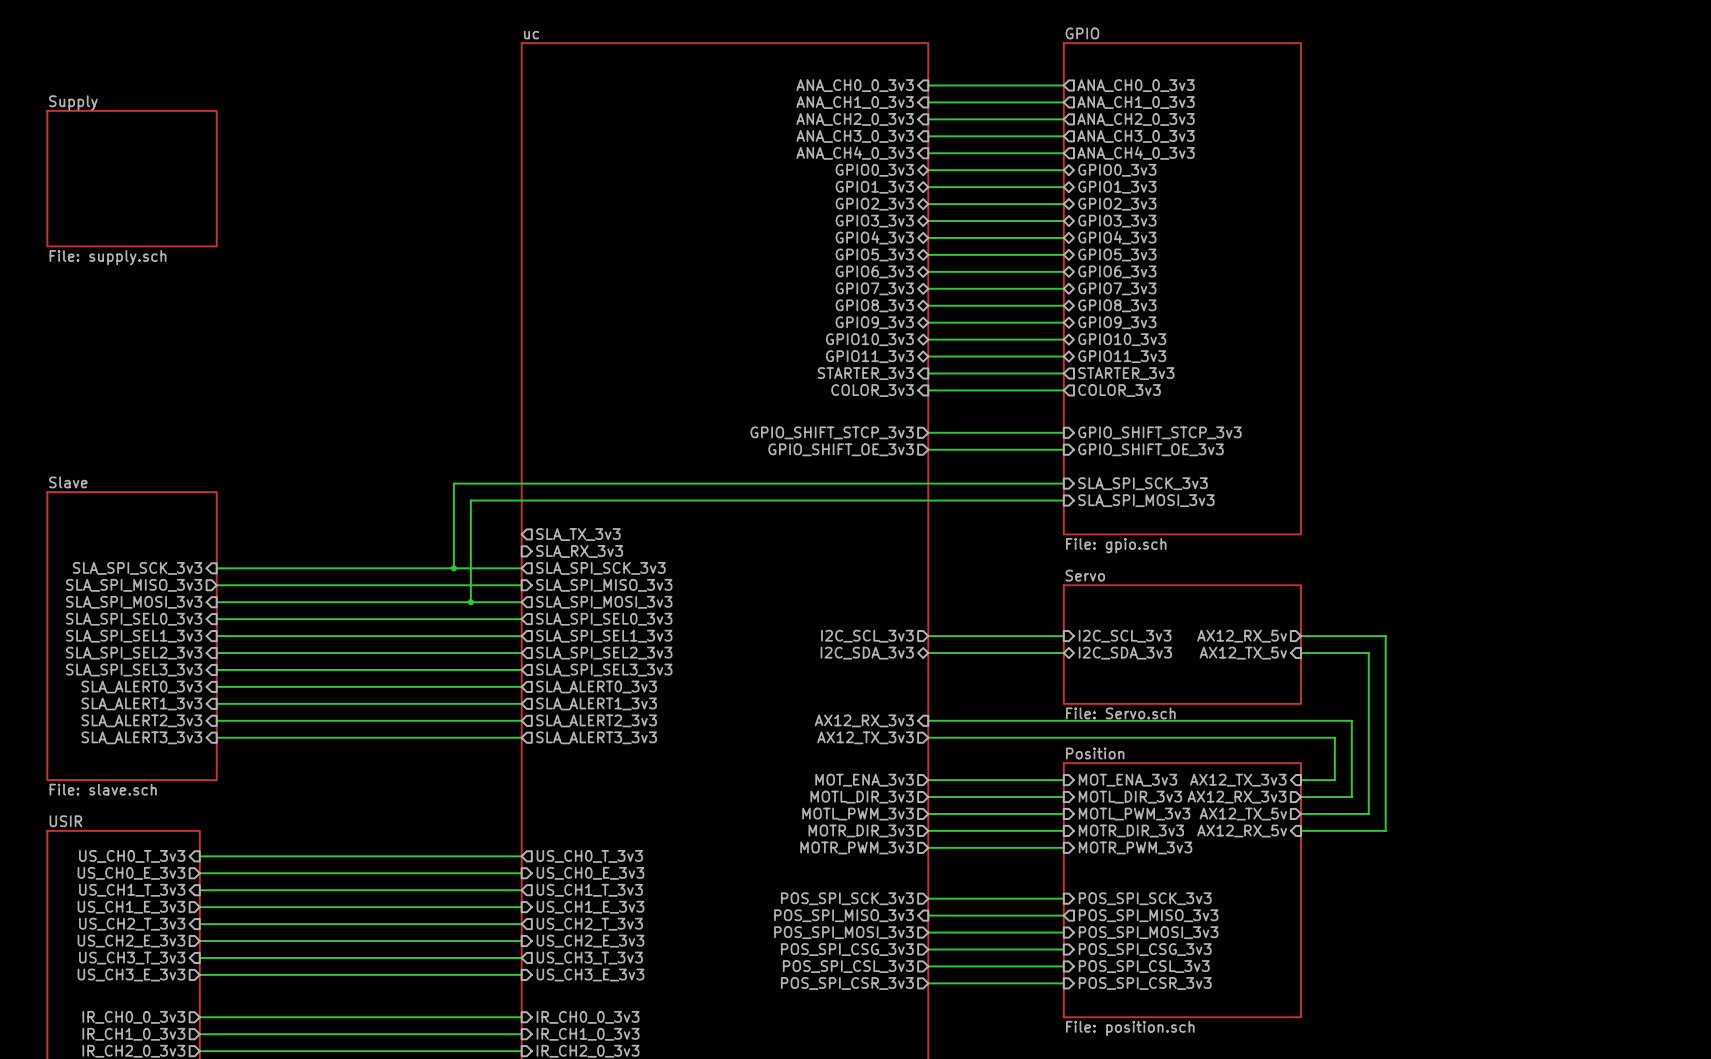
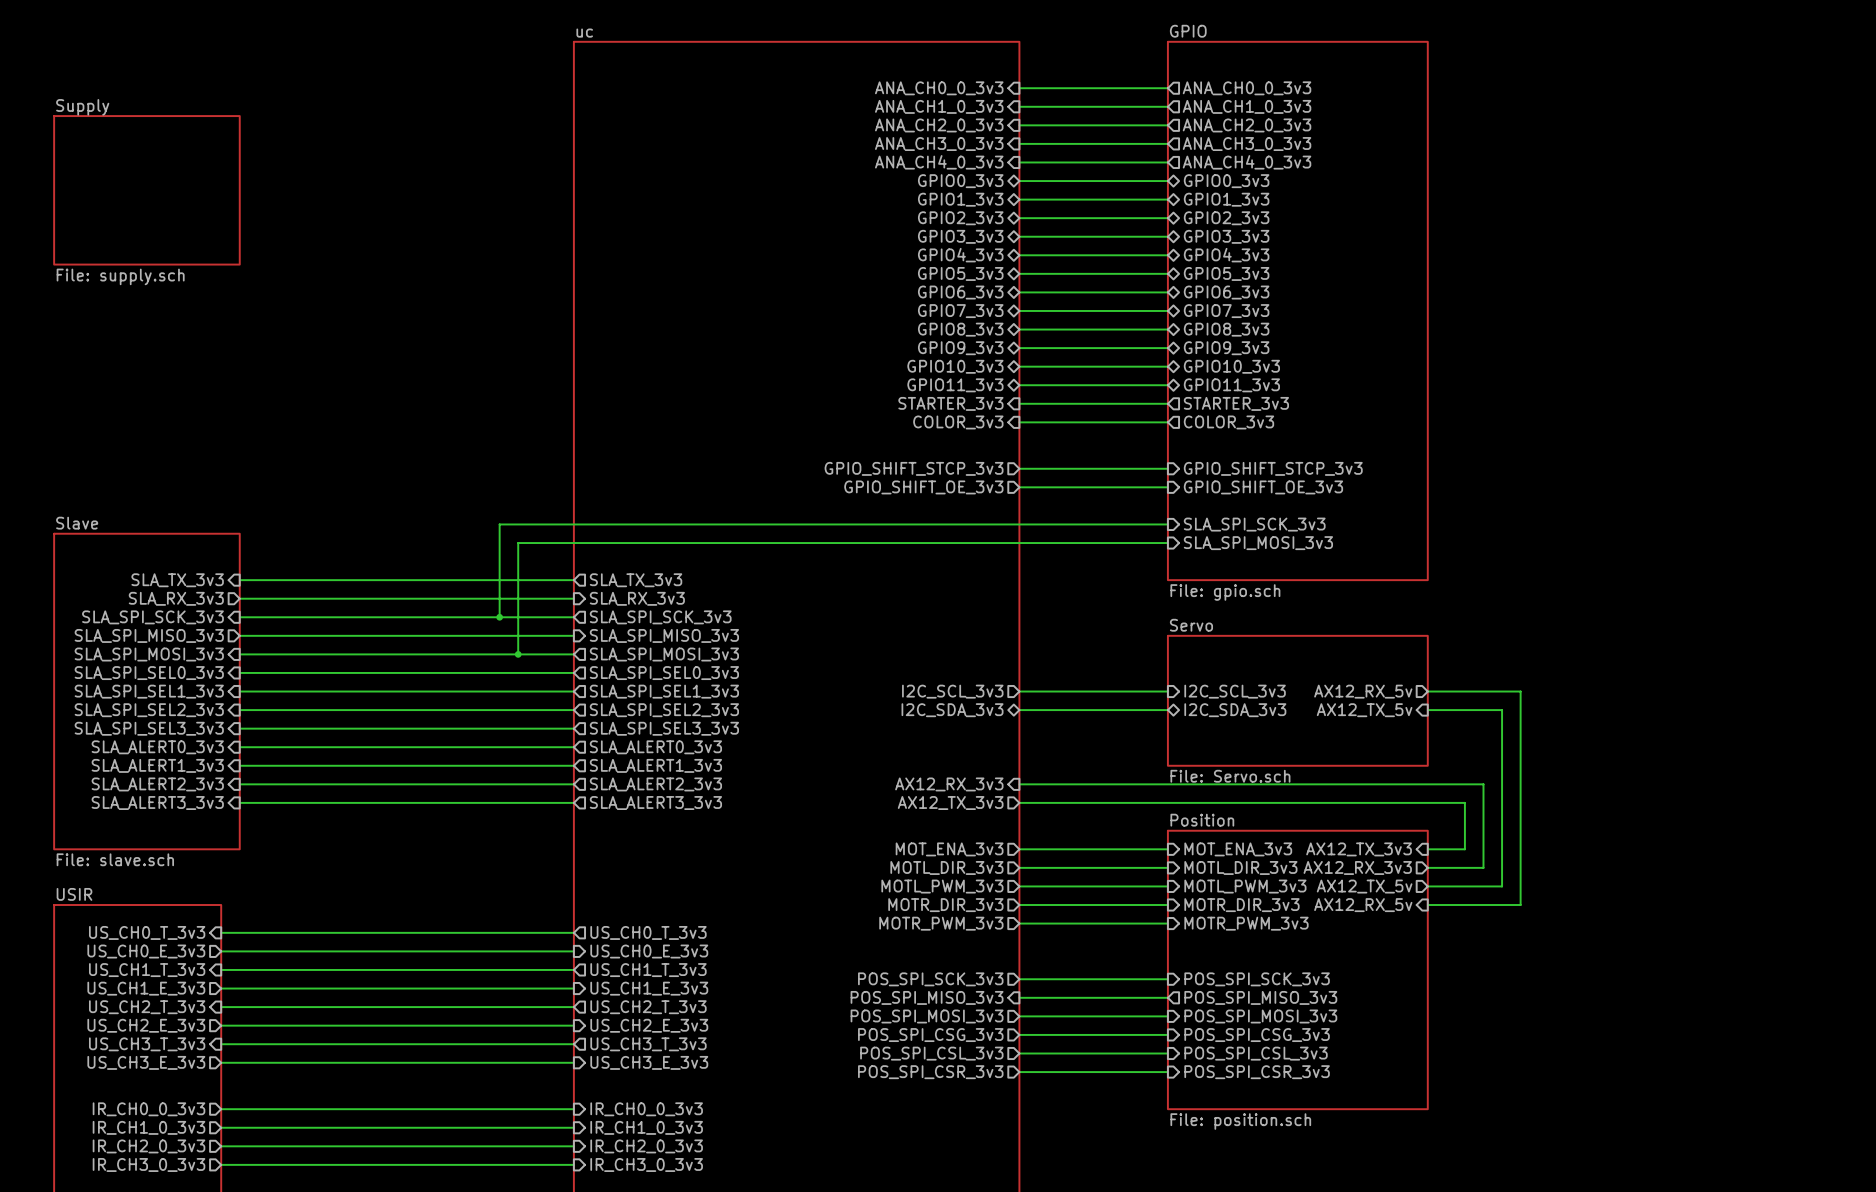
sheet pin: none -> SLA_TX_3v3 (177, 580)
wire: none -> (239, 580) (573, 580)
sheet pin: none -> SLA_RX_3v3 (176, 598)
wire: none -> (239, 598) (573, 598)

